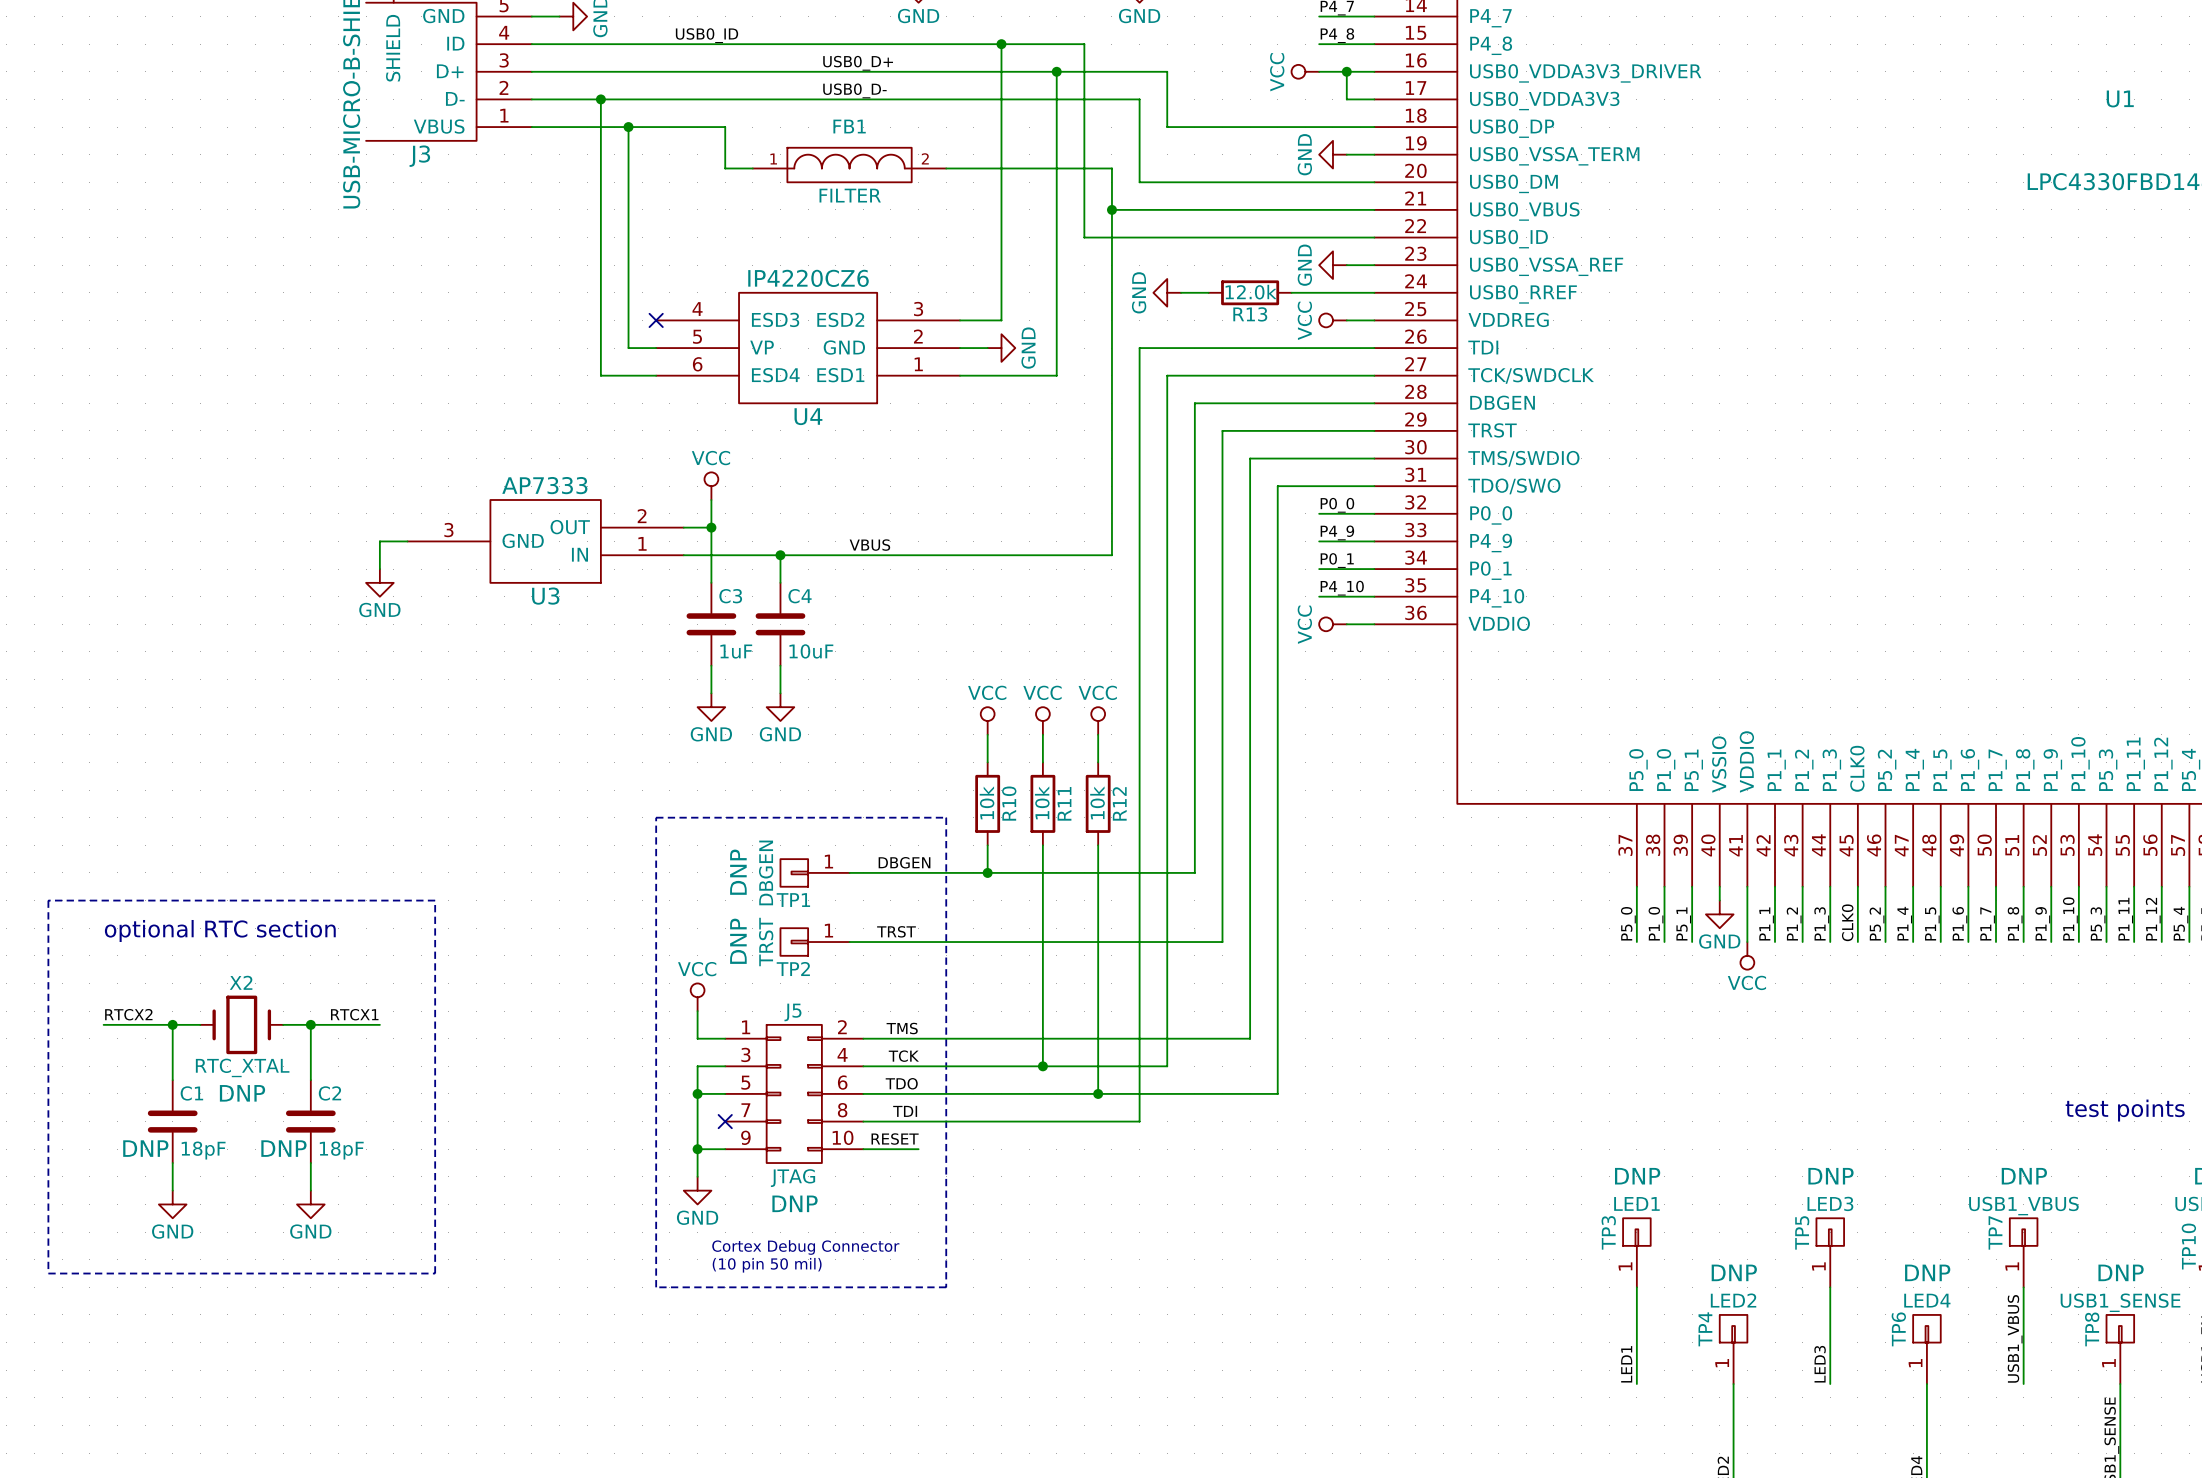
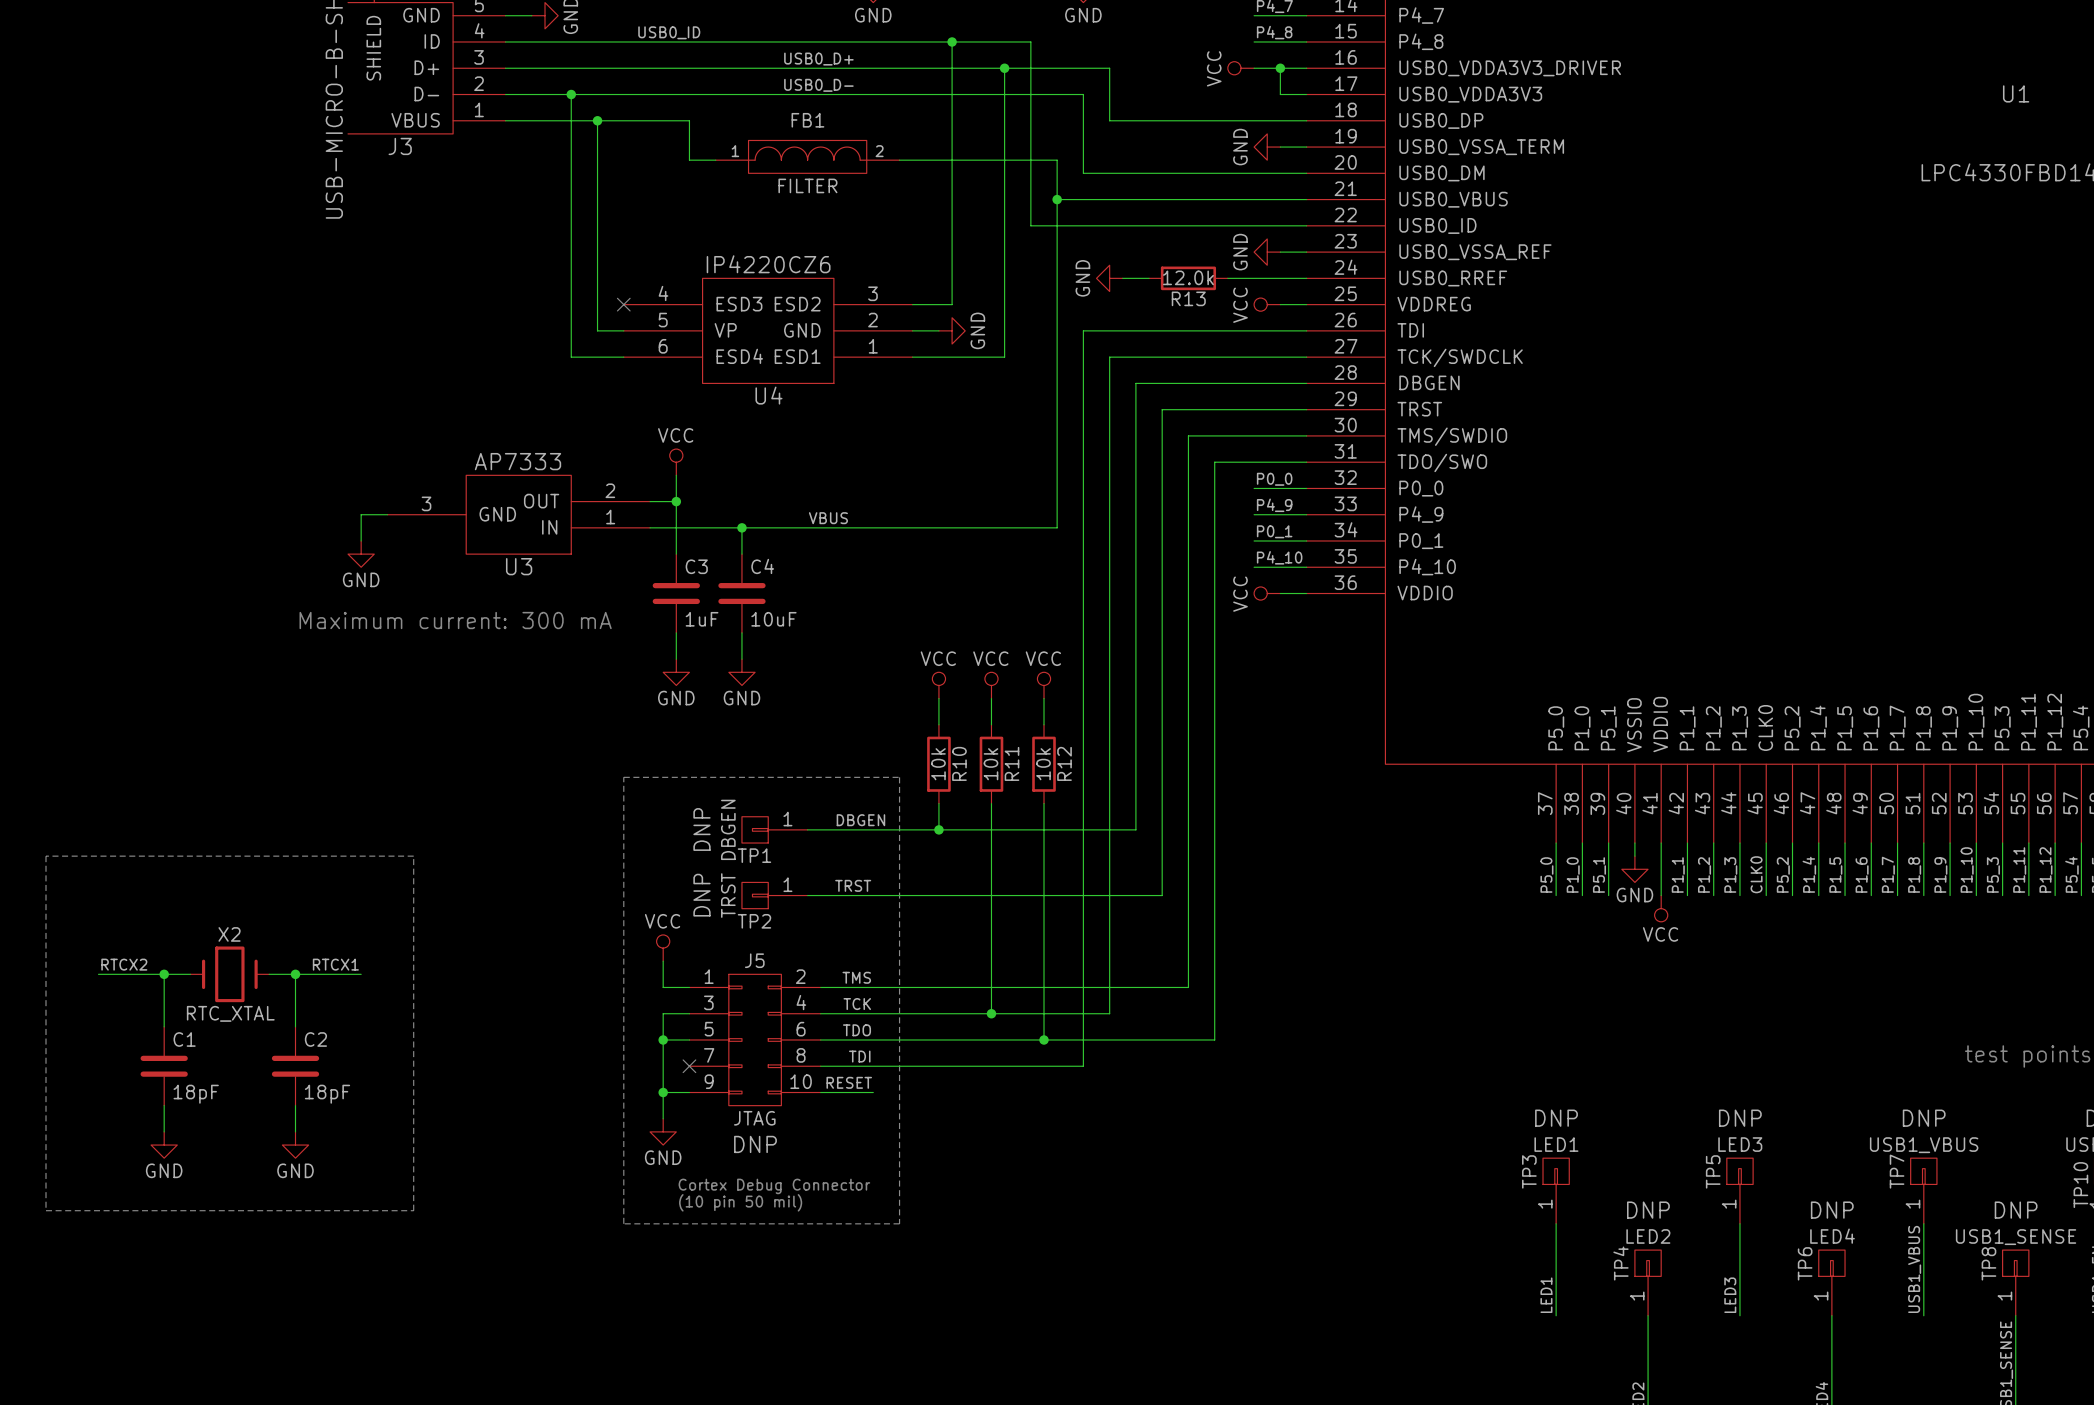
text: none -> Maximum current: 300 mA (455, 620)
text: optional RTC section (220, 930) -> none
X2 text: DNP (242, 1093) -> none
C1 text: DNP (145, 1148) -> none
C2 text: DNP (283, 1148) -> none

